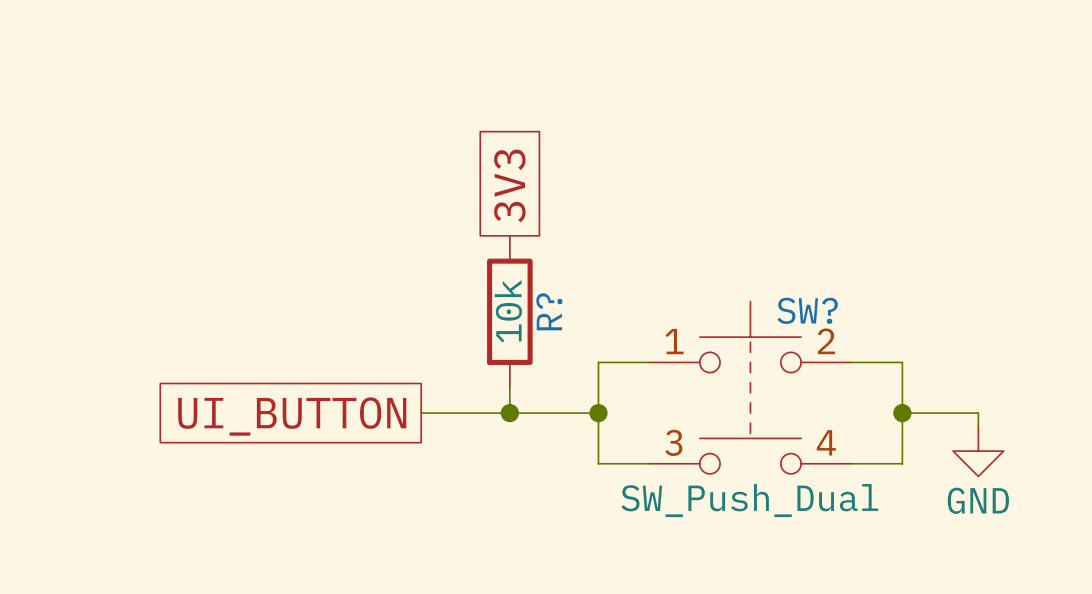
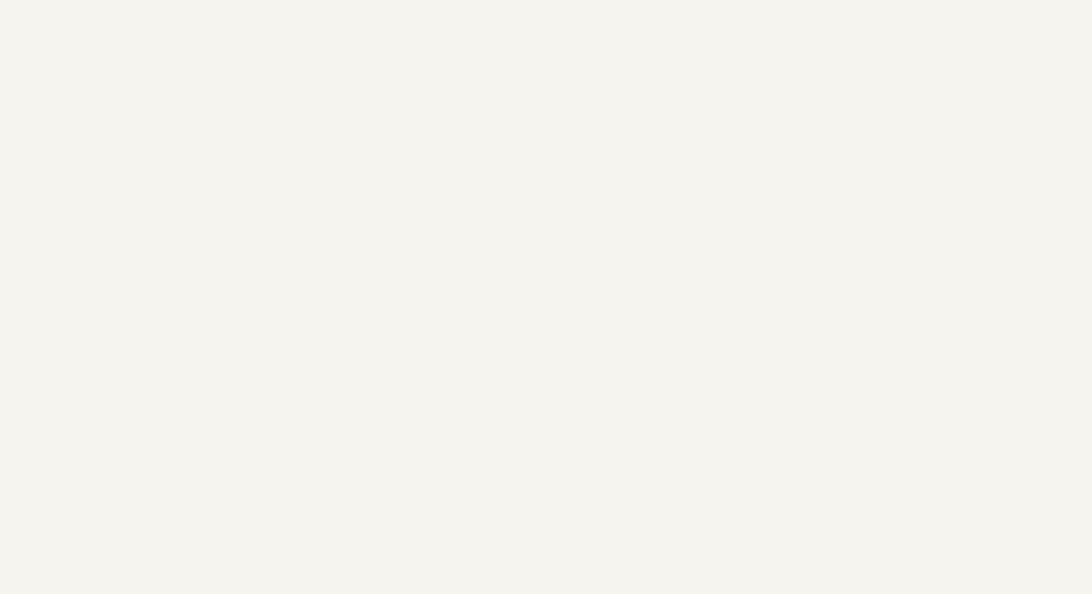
global label: 3V3 (509, 185) -> none
R?: 10k (509, 311) -> none
wire: (649, 362) (598, 362) (598, 463) (649, 463) -> none
wire: (851, 362) (902, 362) (902, 463) (851, 463) -> none
wire: (509, 387) (509, 413) -> none
SW?: SW_Push_Dual (750, 387) -> none
wire: (421, 413) (598, 413) -> none
junction: (509, 413) -> none
junction: (598, 413) -> none
wire: (902, 413) (978, 413) (978, 425) -> none
junction: (902, 413) -> none
global label: UI_BUTTON (292, 416) -> none
power symbol: GND (978, 451) -> none

